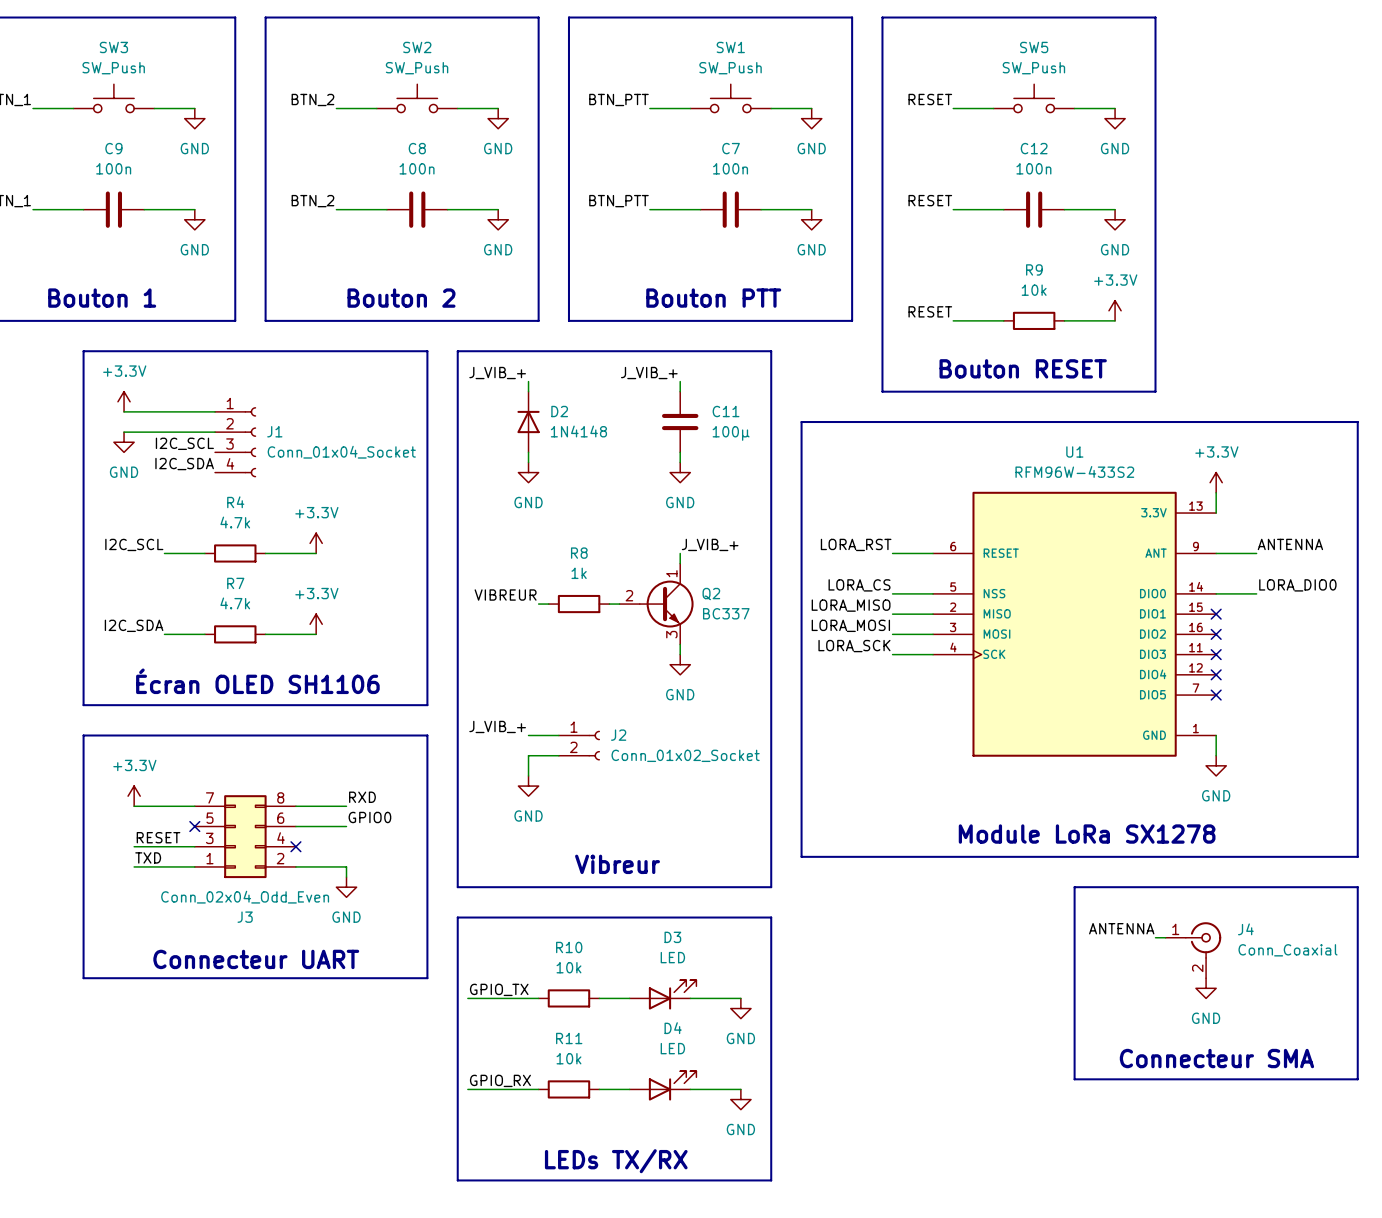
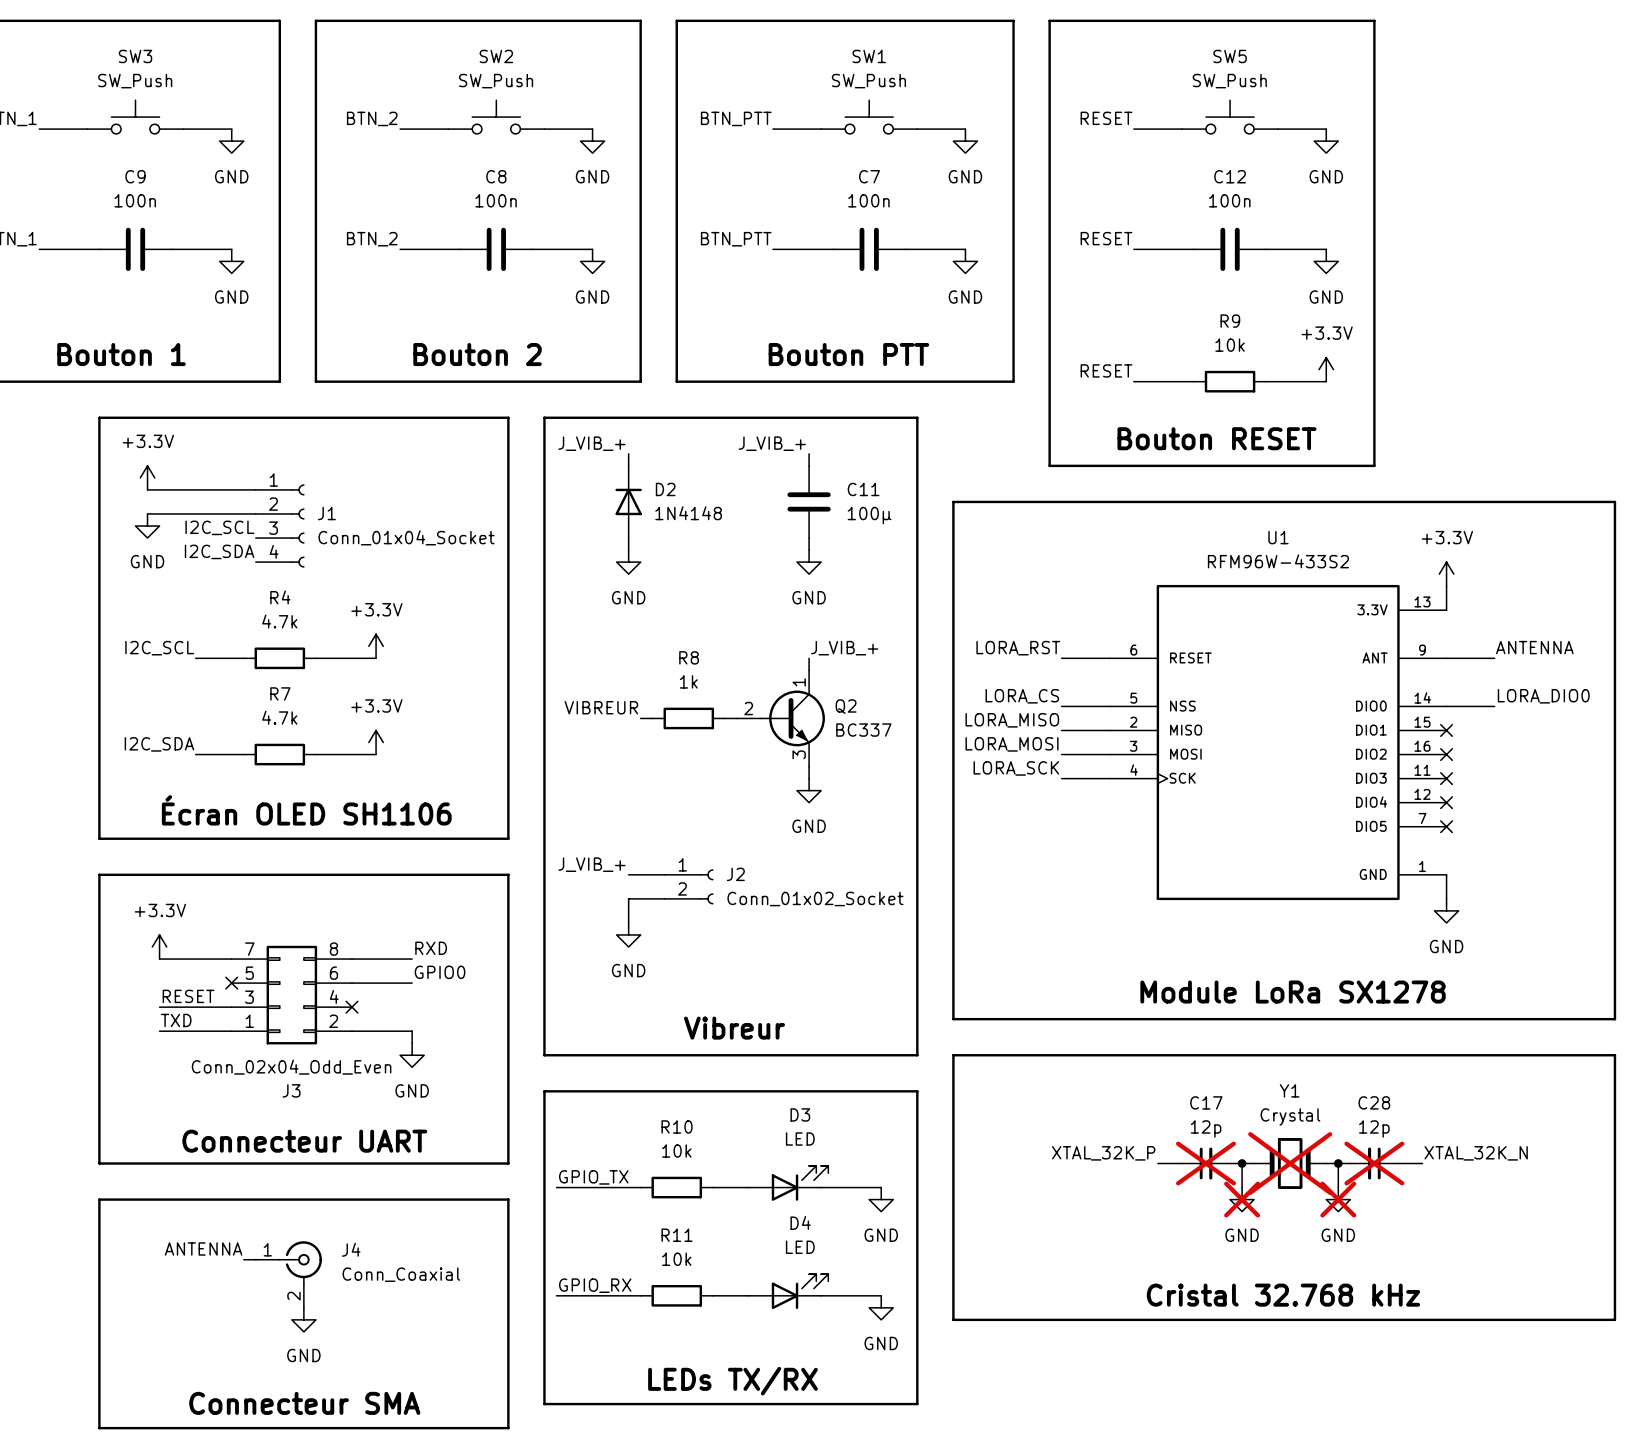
line: (1074, 887) (1074, 1079) (1357, 1079) -> (1278, 1055) (953, 1055) (953, 1319) (1614, 1319) (1614, 1283)
label: ANTENNA (1121, 928) -> none
wire: (1155, 937) (1165, 937) -> none
J4 position: (1193, 950) -> (288, 1274)
label: none -> XTAL_32K_P (1103, 1153)
label: none -> XTAL_32K_N (1476, 1153)
wire: none -> (1157, 1163) (1181, 1163)
C17: none -> 12p (1205, 1163)
wire: none -> (1230, 1163) (1254, 1163)
wire: none -> (1242, 1163) (1242, 1187)
junction: none -> (1242, 1163)
Y1: none -> Crystal (1290, 1163)
wire: none -> (1326, 1163) (1350, 1163)
wire: none -> (1338, 1163) (1338, 1187)
junction: none -> (1338, 1163)
C28: none -> 12p (1374, 1163)
wire: none -> (1398, 1163) (1422, 1163)
power symbol: GND (1206, 988) -> none
line: none -> (99, 1199) (99, 1428) (508, 1428) (508, 1199) (99, 1199)
power symbol: none -> GND (1242, 1199)
power symbol: none -> GND (1338, 1199)
label: none -> ANTENNA (203, 1248)
text: Connecteur SMA (1216, 1058) -> none
wire: none -> (243, 1259) (255, 1259)
text: none -> Cristal 32.768 kHz (1283, 1295)
power symbol: none -> GND (303, 1319)
text: none -> Connecteur SMA (304, 1403)

